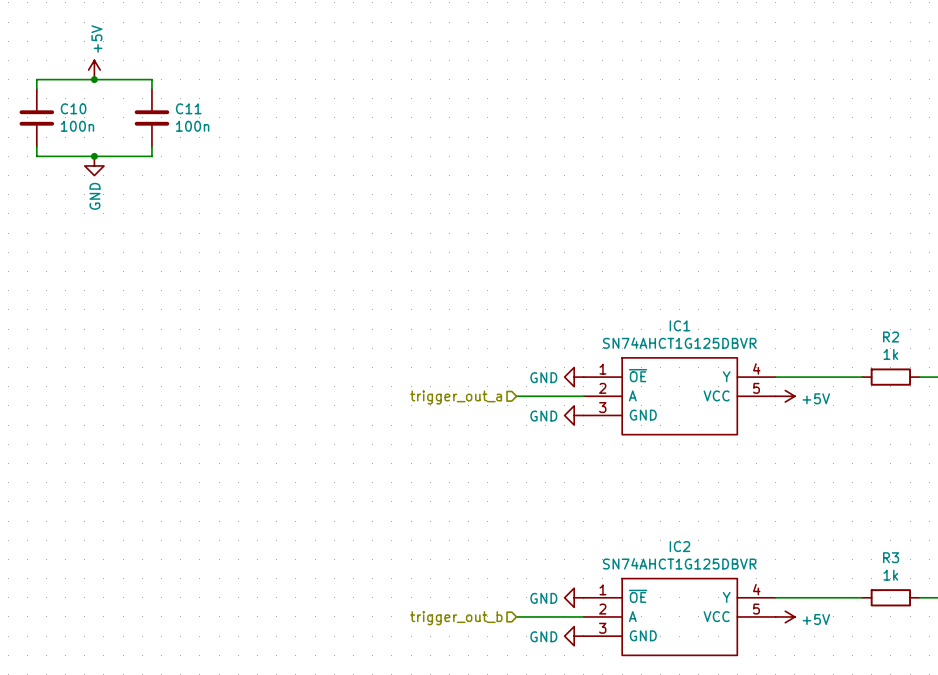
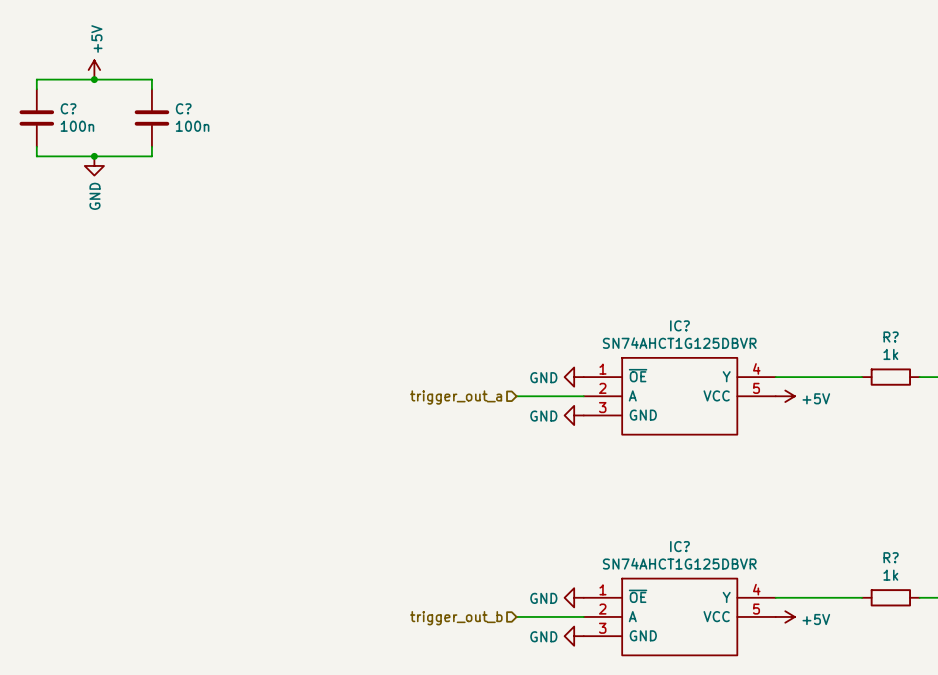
C10 name: C10 (73, 108) -> C? (68, 108)
C11 name: C11 (188, 108) -> C? (183, 108)
IC1 name: IC1 (679, 325) -> IC? (679, 325)
R2 name: R2 (891, 337) -> R? (891, 337)
IC2 name: IC2 (679, 546) -> IC? (679, 546)
R3 name: R3 (891, 557) -> R? (891, 557)

